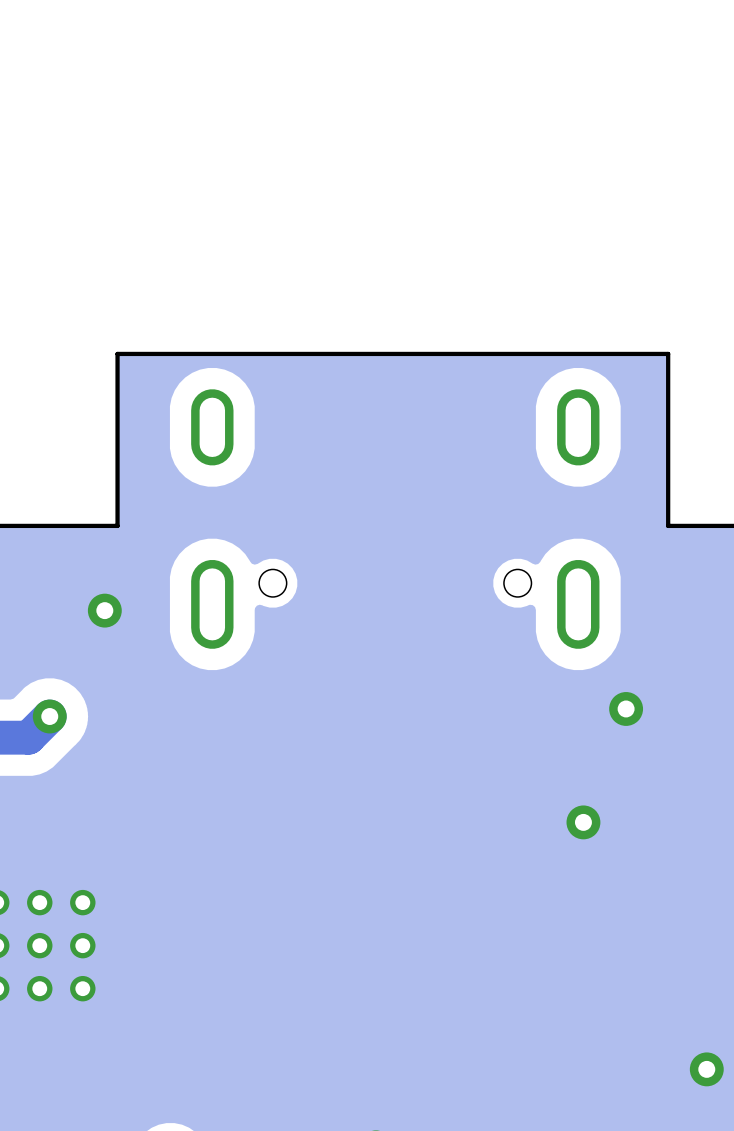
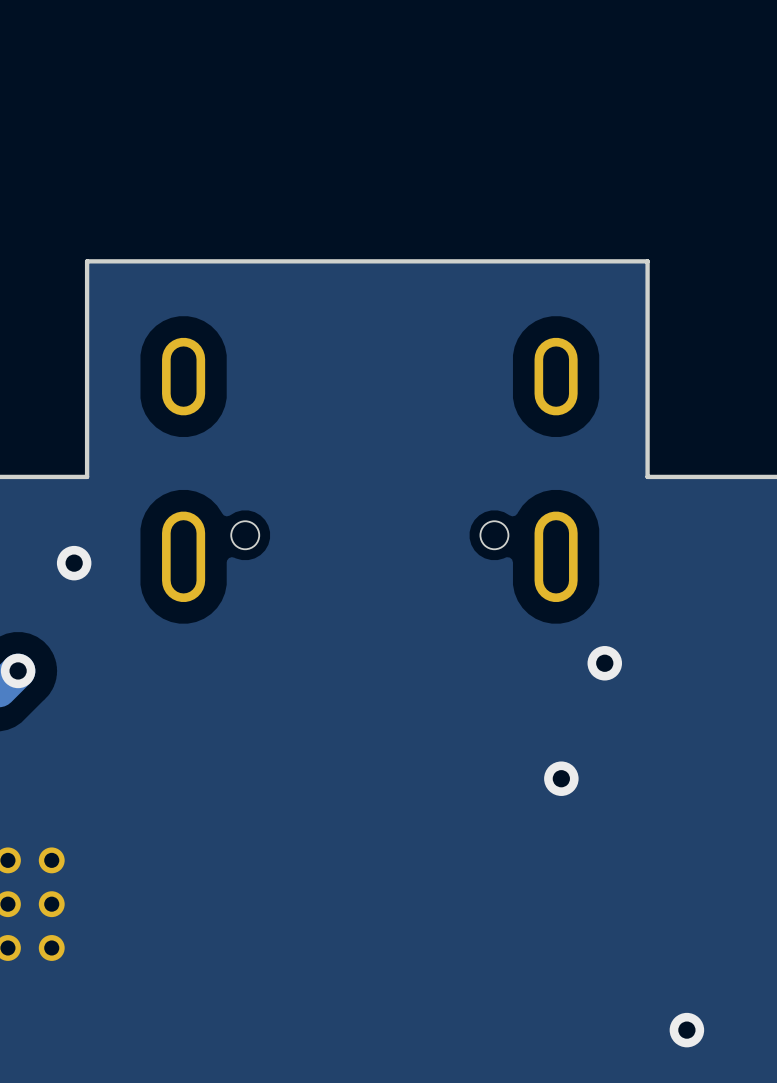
board edge: (668, 353) (117, 353) -> (647, 301) (647, 261) (87, 261) (87, 301)

